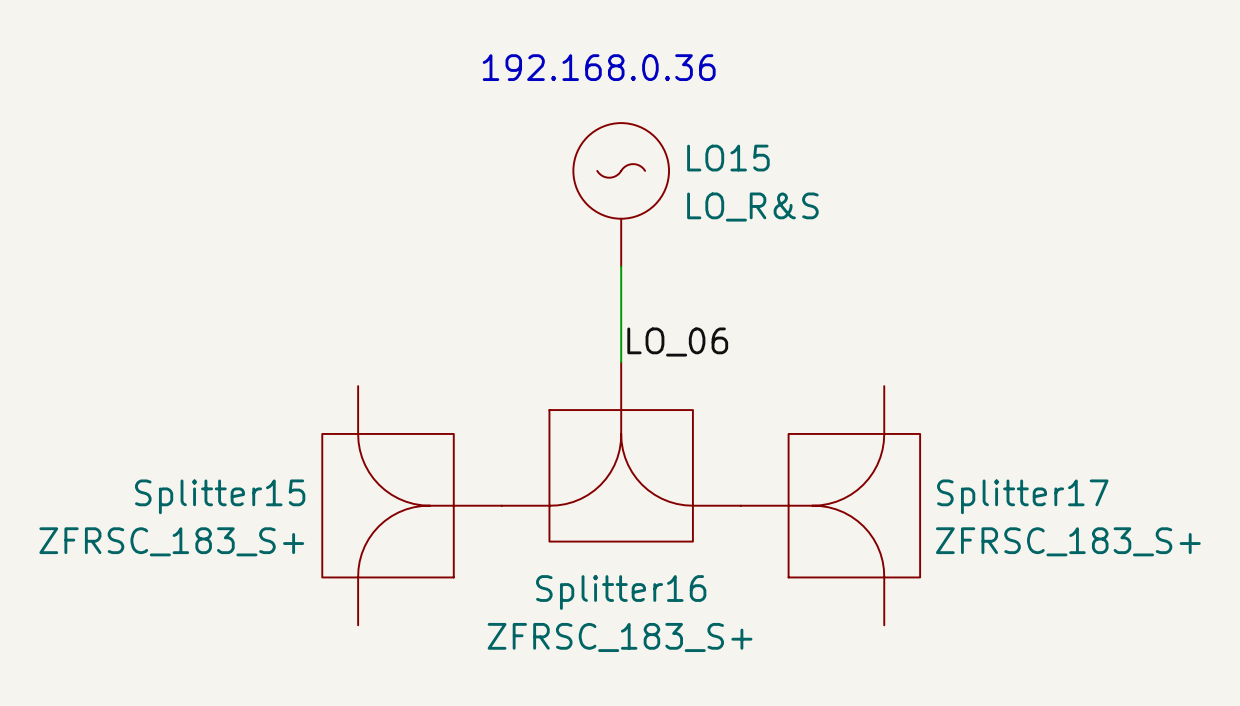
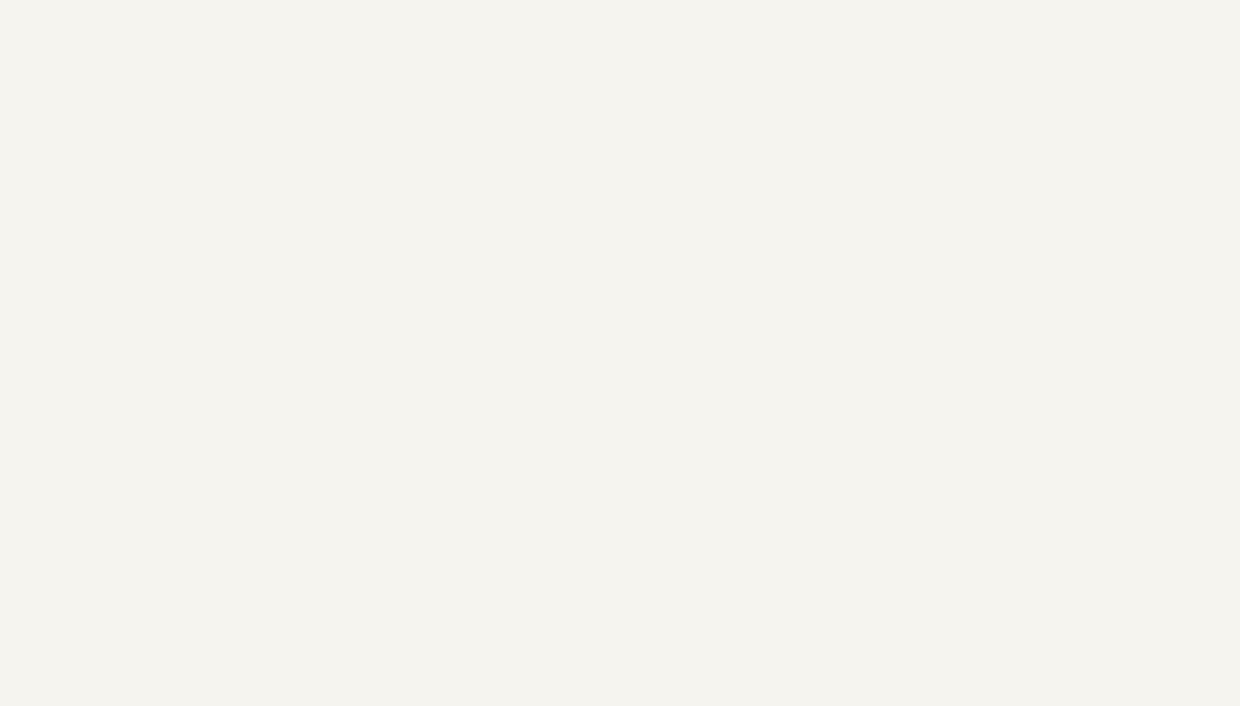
text: 192.168.0.36 (599, 67) -> none
LO15: LO_R&S (621, 194) -> none
wire: (621, 266) (621, 362) -> none
label: LO_06 (677, 342) -> none
Splitter16: ZFRSC_183_S+ (621, 451) -> none
Splitter15: ZFRSC_183_S+ (411, 505) -> none
Splitter17: ZFRSC_183_S+ (830, 505) -> none

